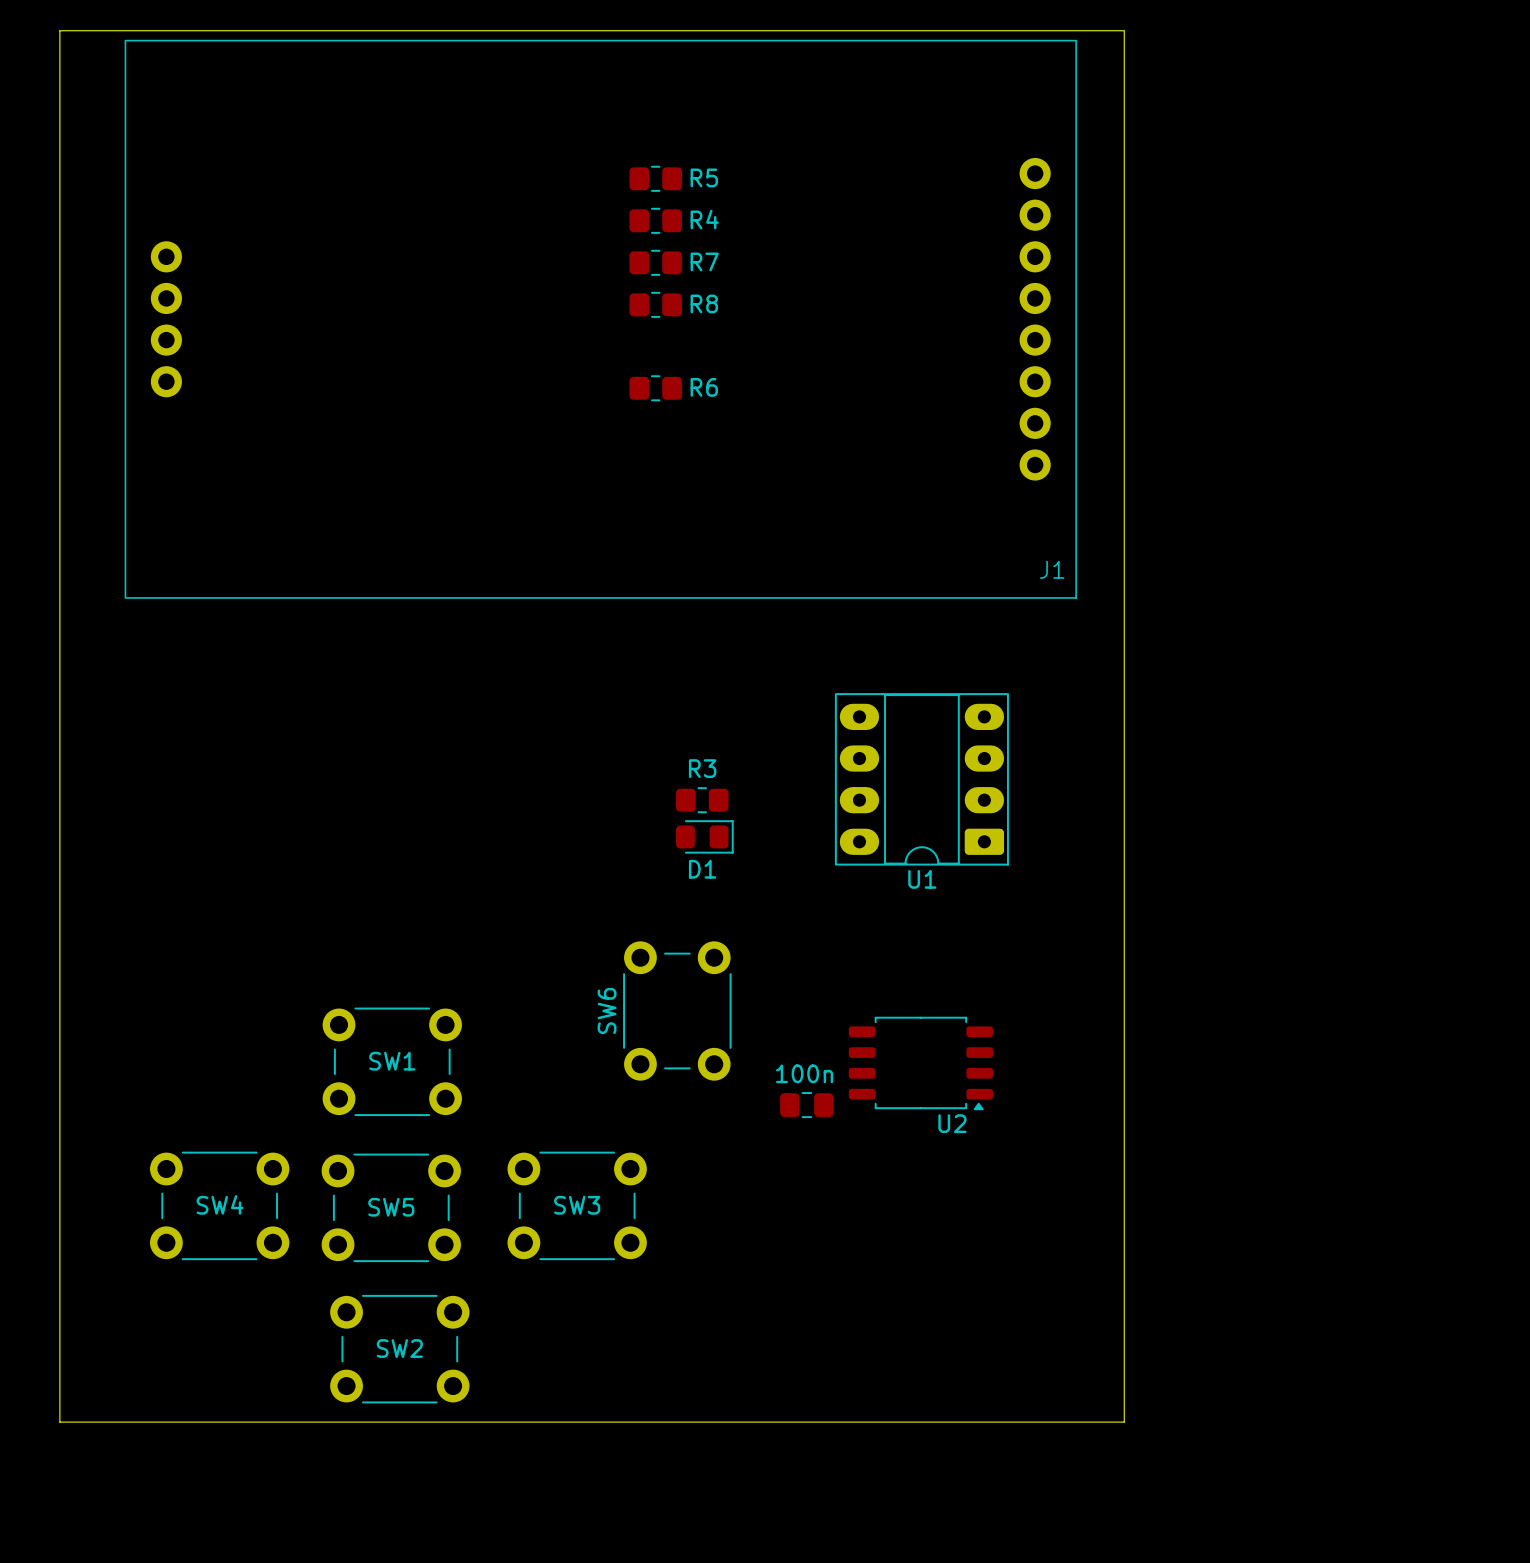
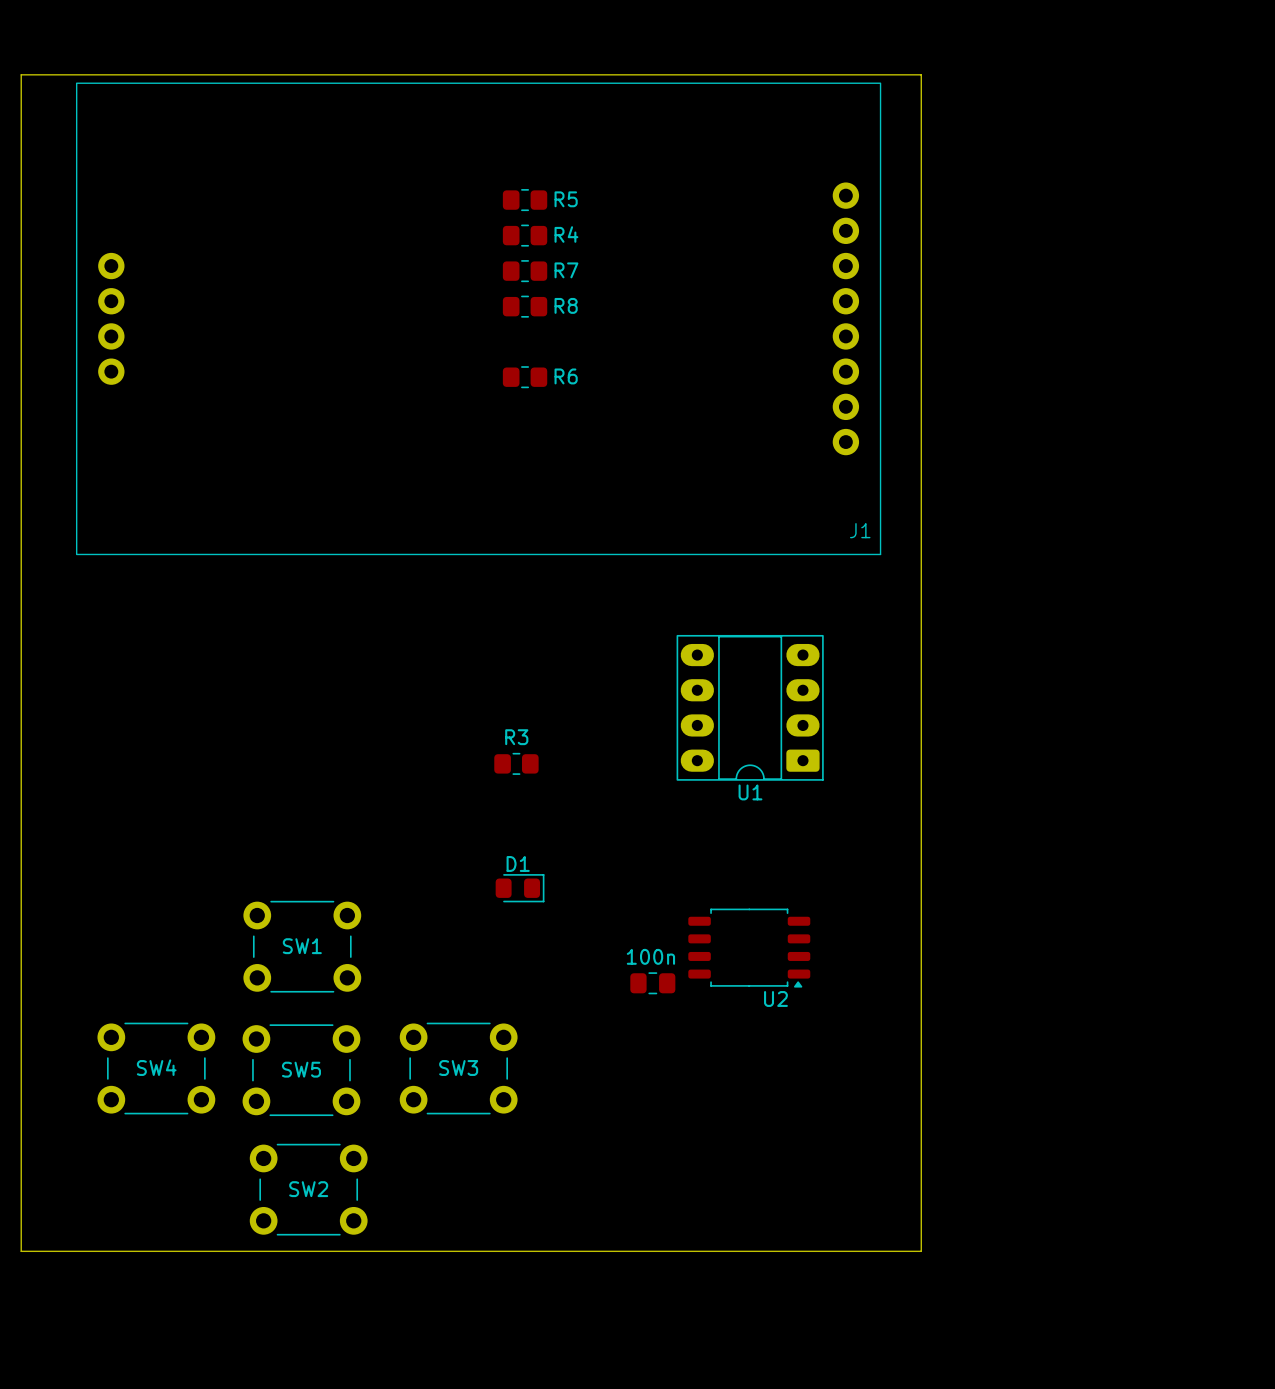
R3 position: (702, 800) -> (516, 763)
D1 position: (704, 836) -> (520, 888)
D1 name position: D1 (702, 869) -> D1 (518, 863)
SW6: (677, 1010) -> none

